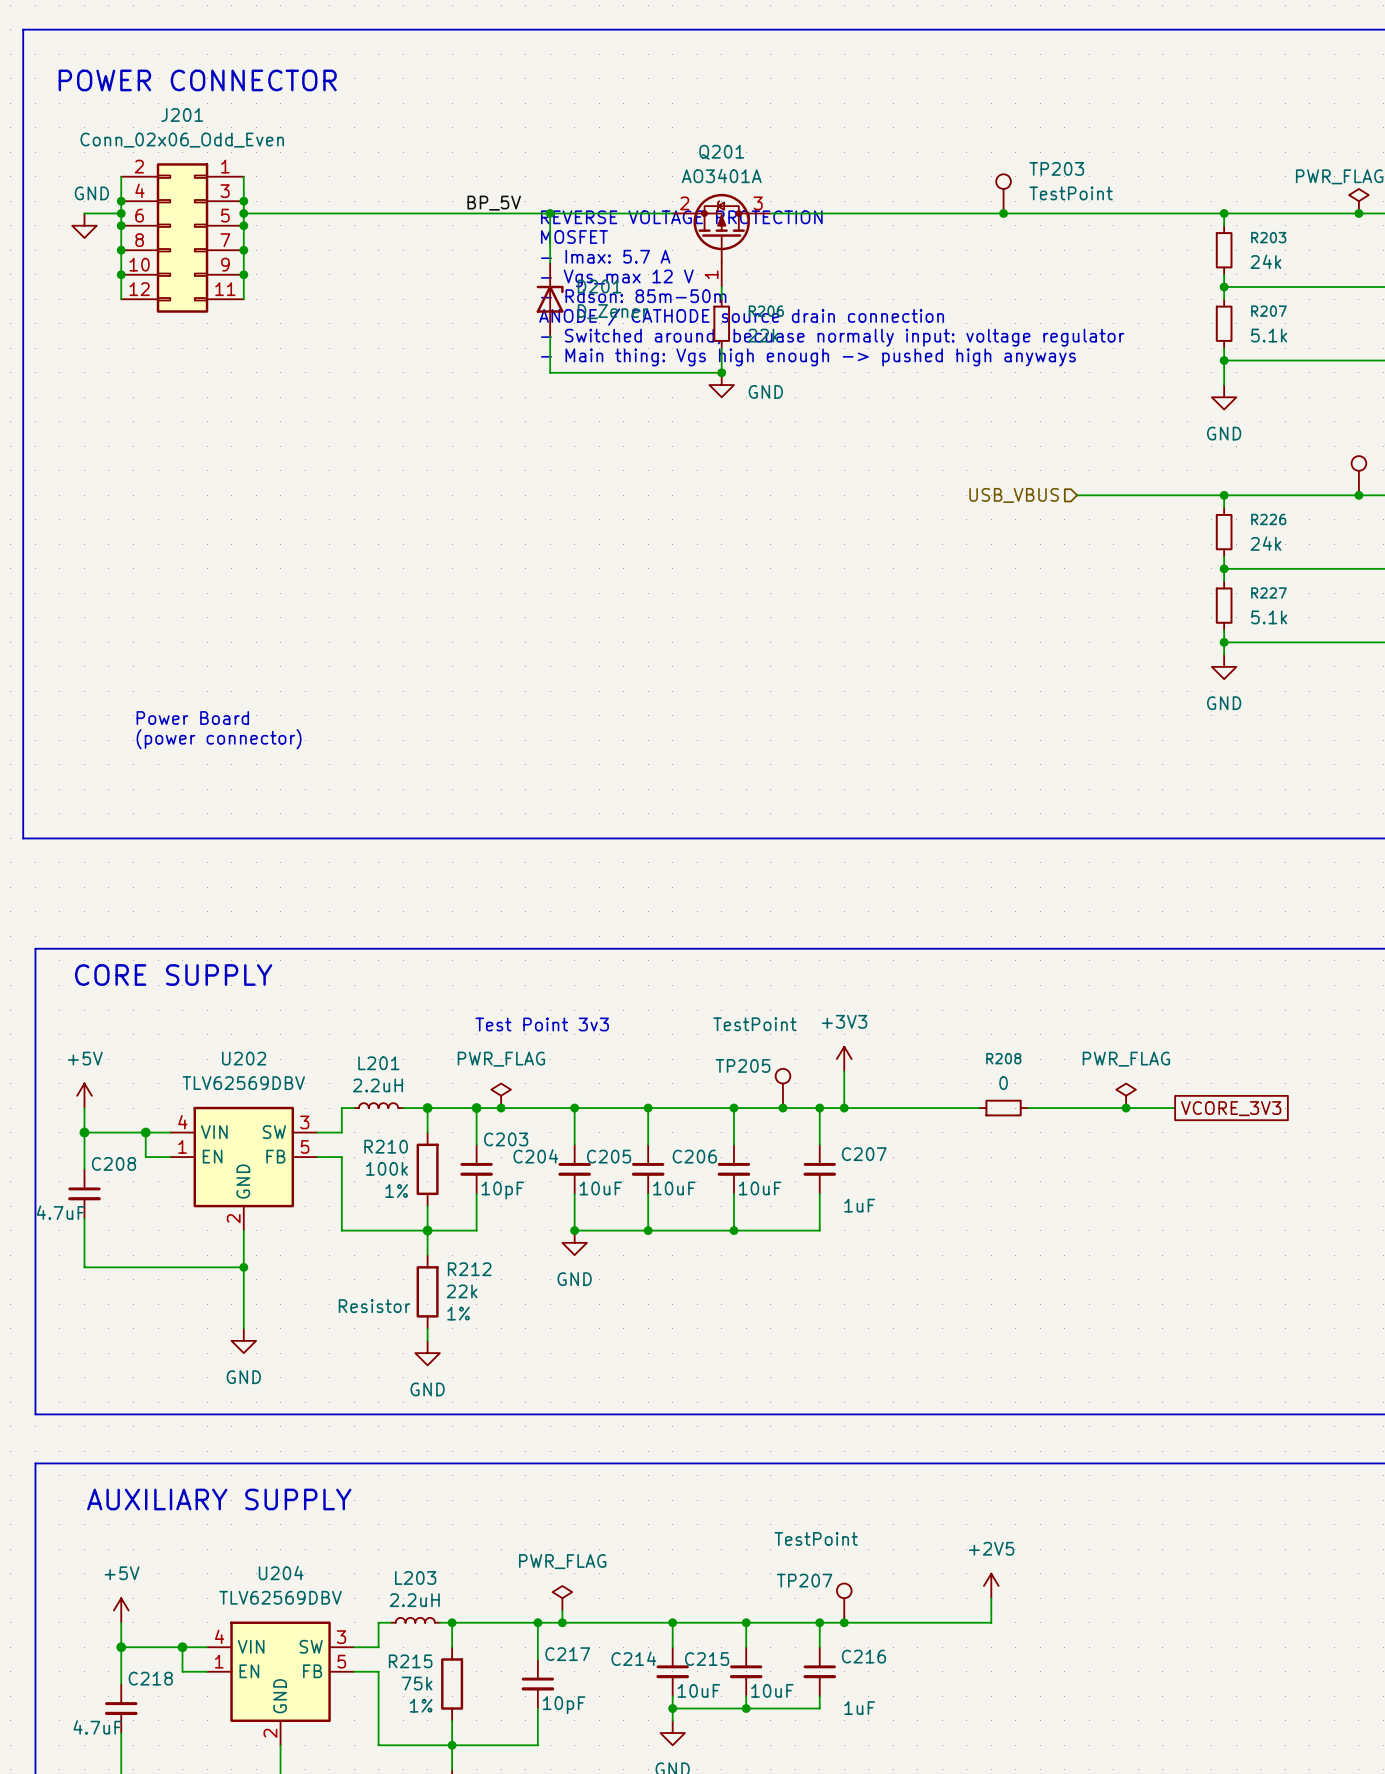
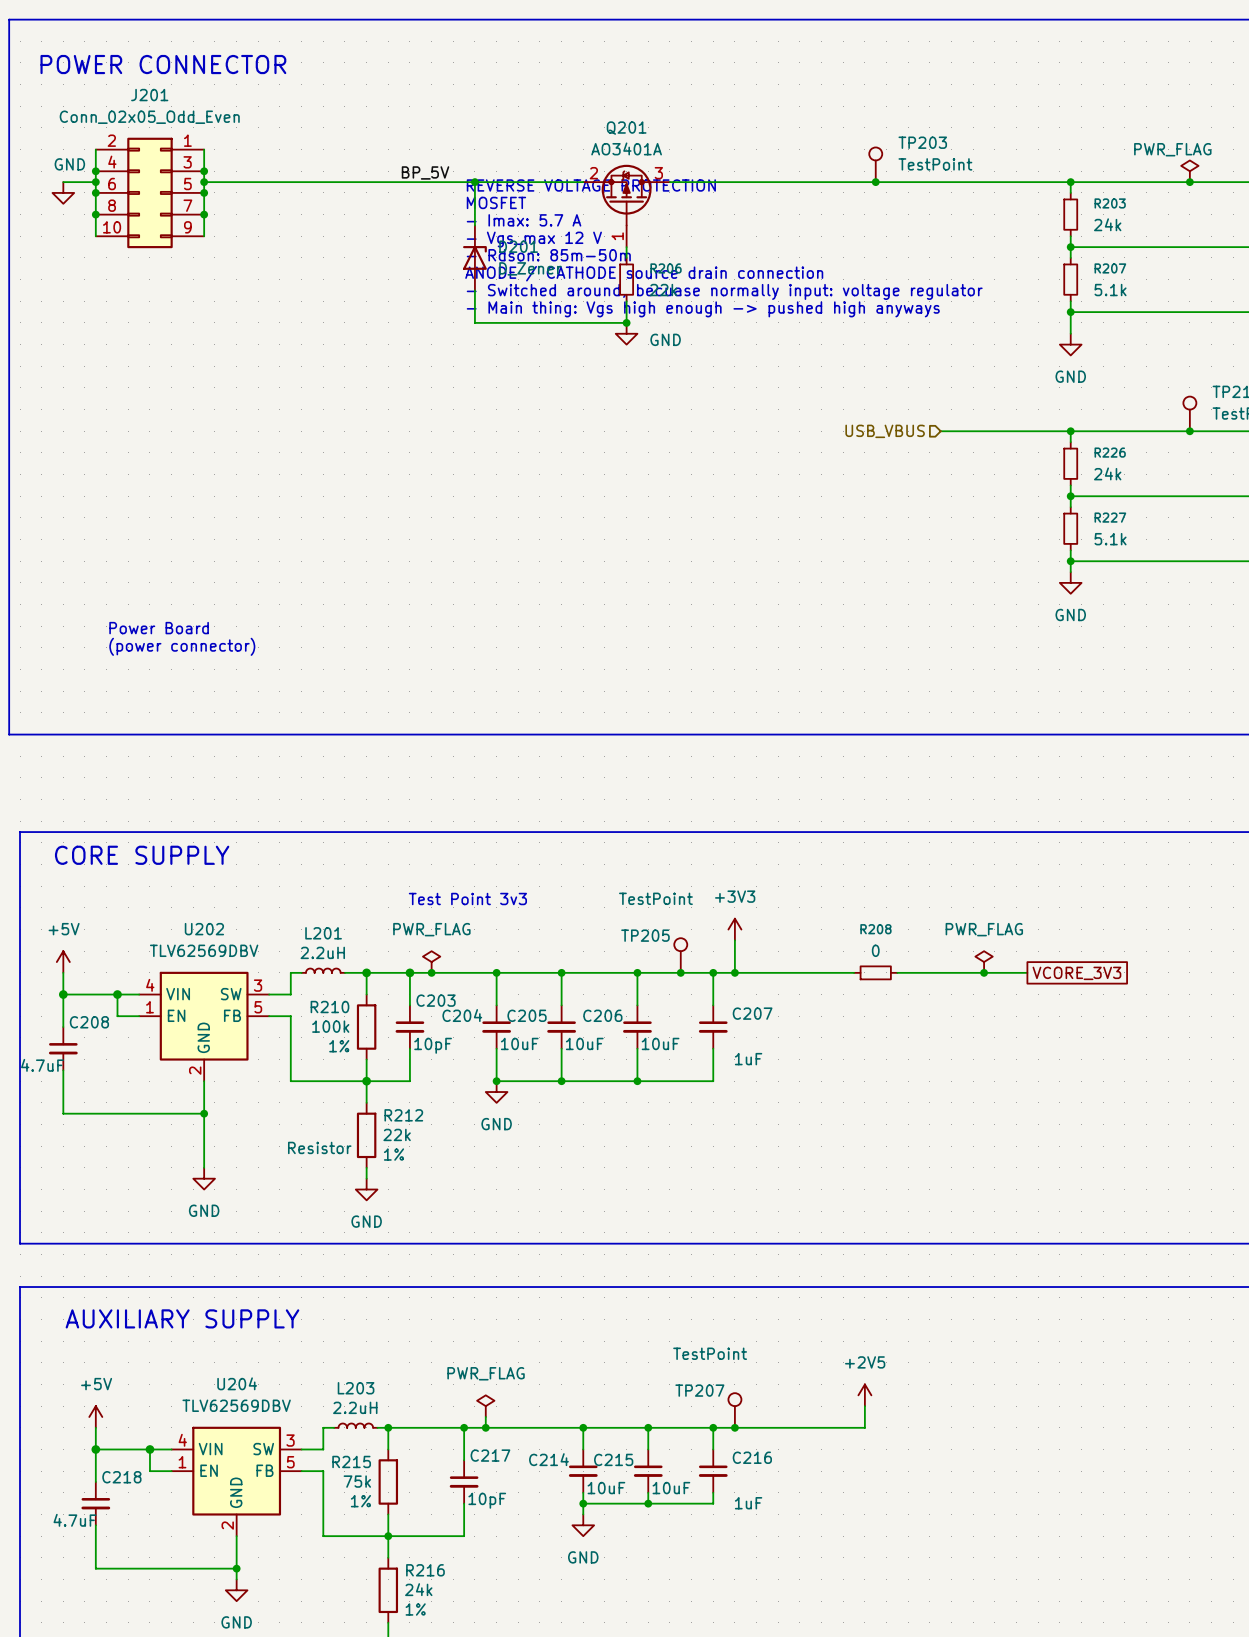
J201 value: Conn_02x06_Odd_Even (182, 140) -> Conn_02x05_Odd_Even (149, 117)
J201 symbol: [121, 163, 244, 313] -> [95, 137, 205, 249]
wire: (121, 274) (121, 299) -> none
junction: (121, 274) -> none
wire: (243, 274) (243, 299) -> none
junction: (243, 274) -> none

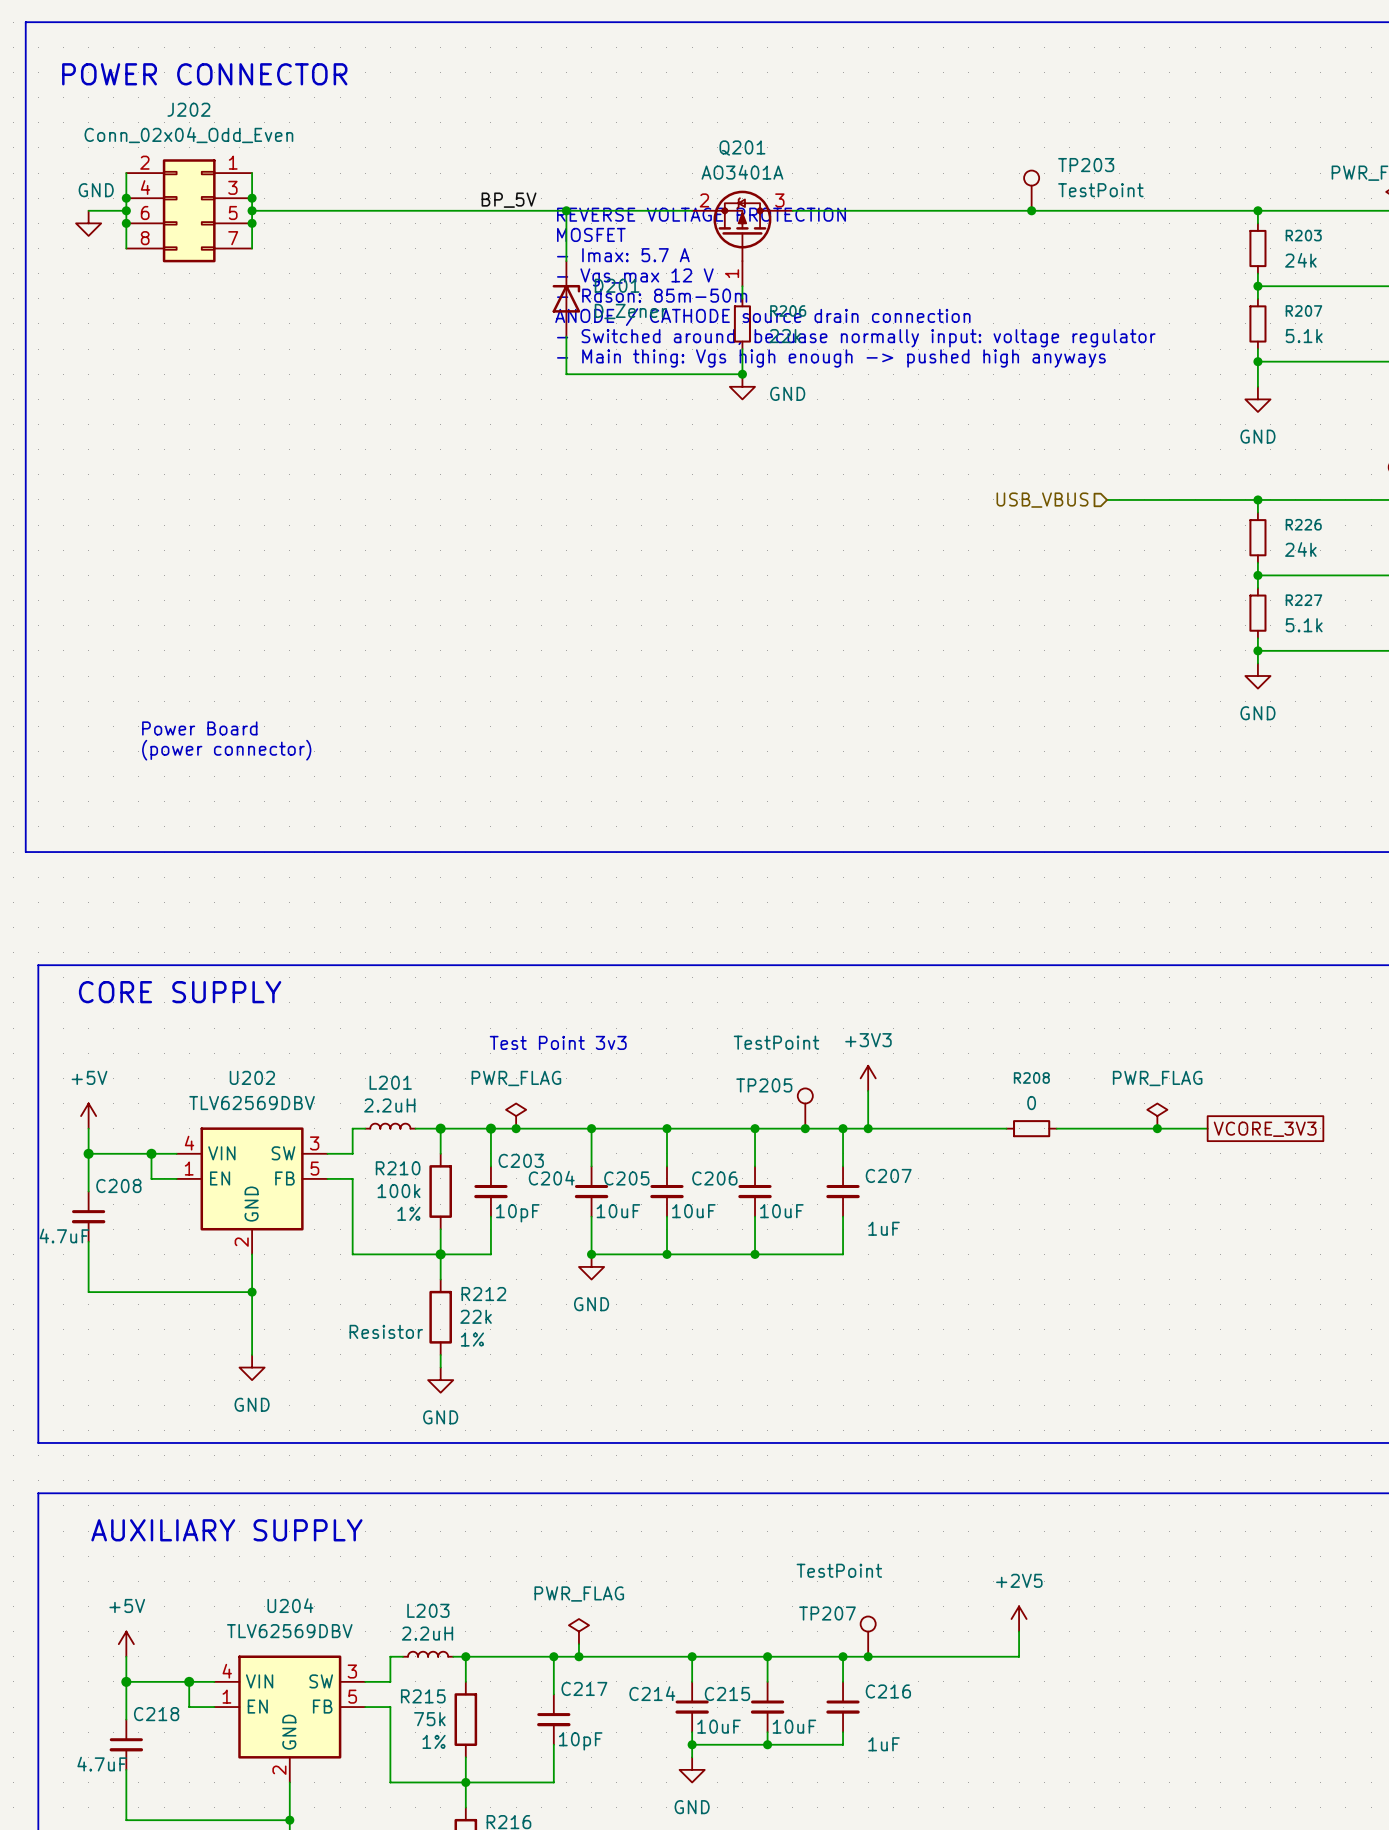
J202: none -> Conn_02x04_Odd_Even (189, 210)
J201: Conn_02x05_Odd_Even (149, 192) -> none
wire: (95, 214) (95, 236) -> none
junction: (95, 214) -> none
wire: (204, 214) (204, 236) -> none
junction: (204, 214) -> none

